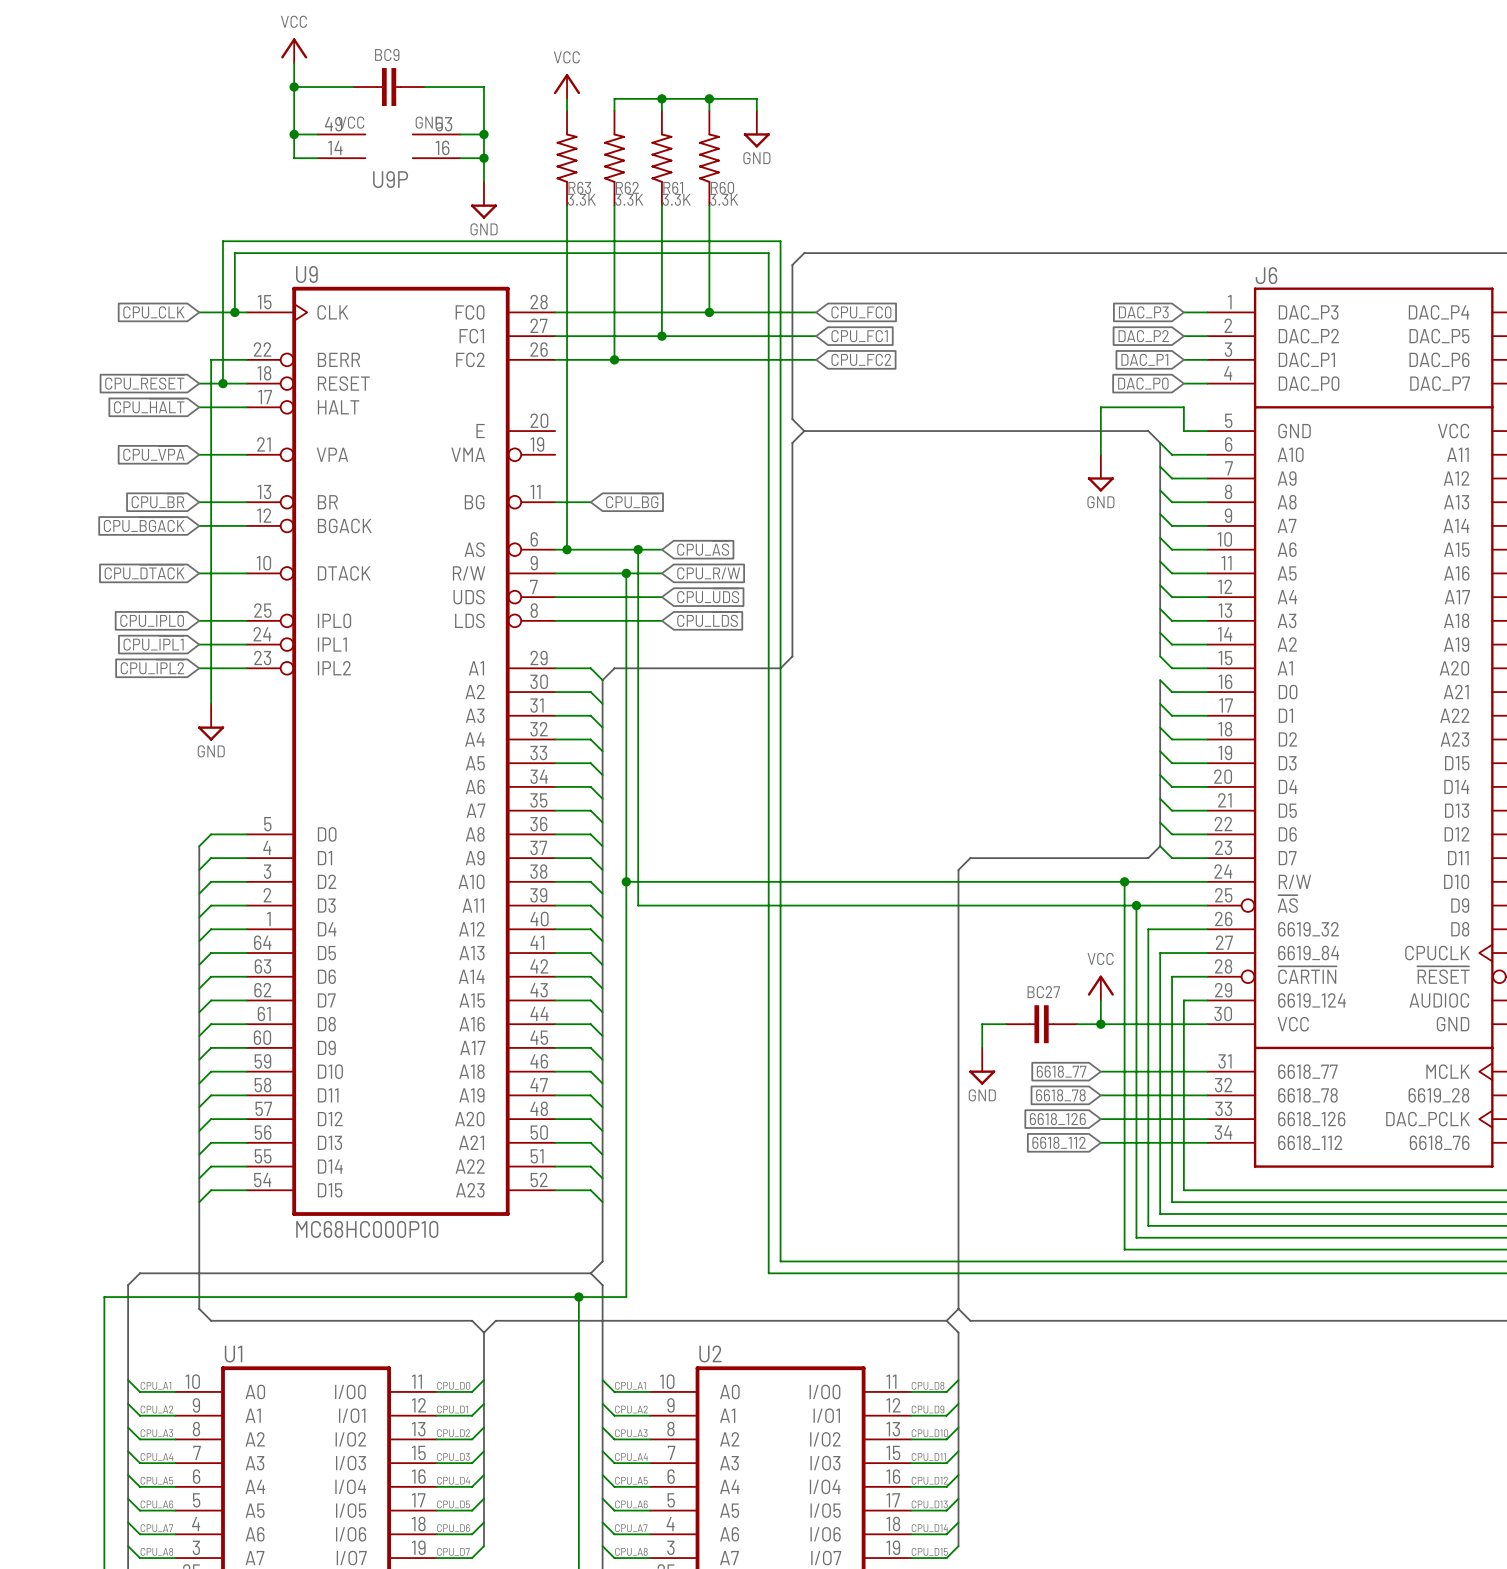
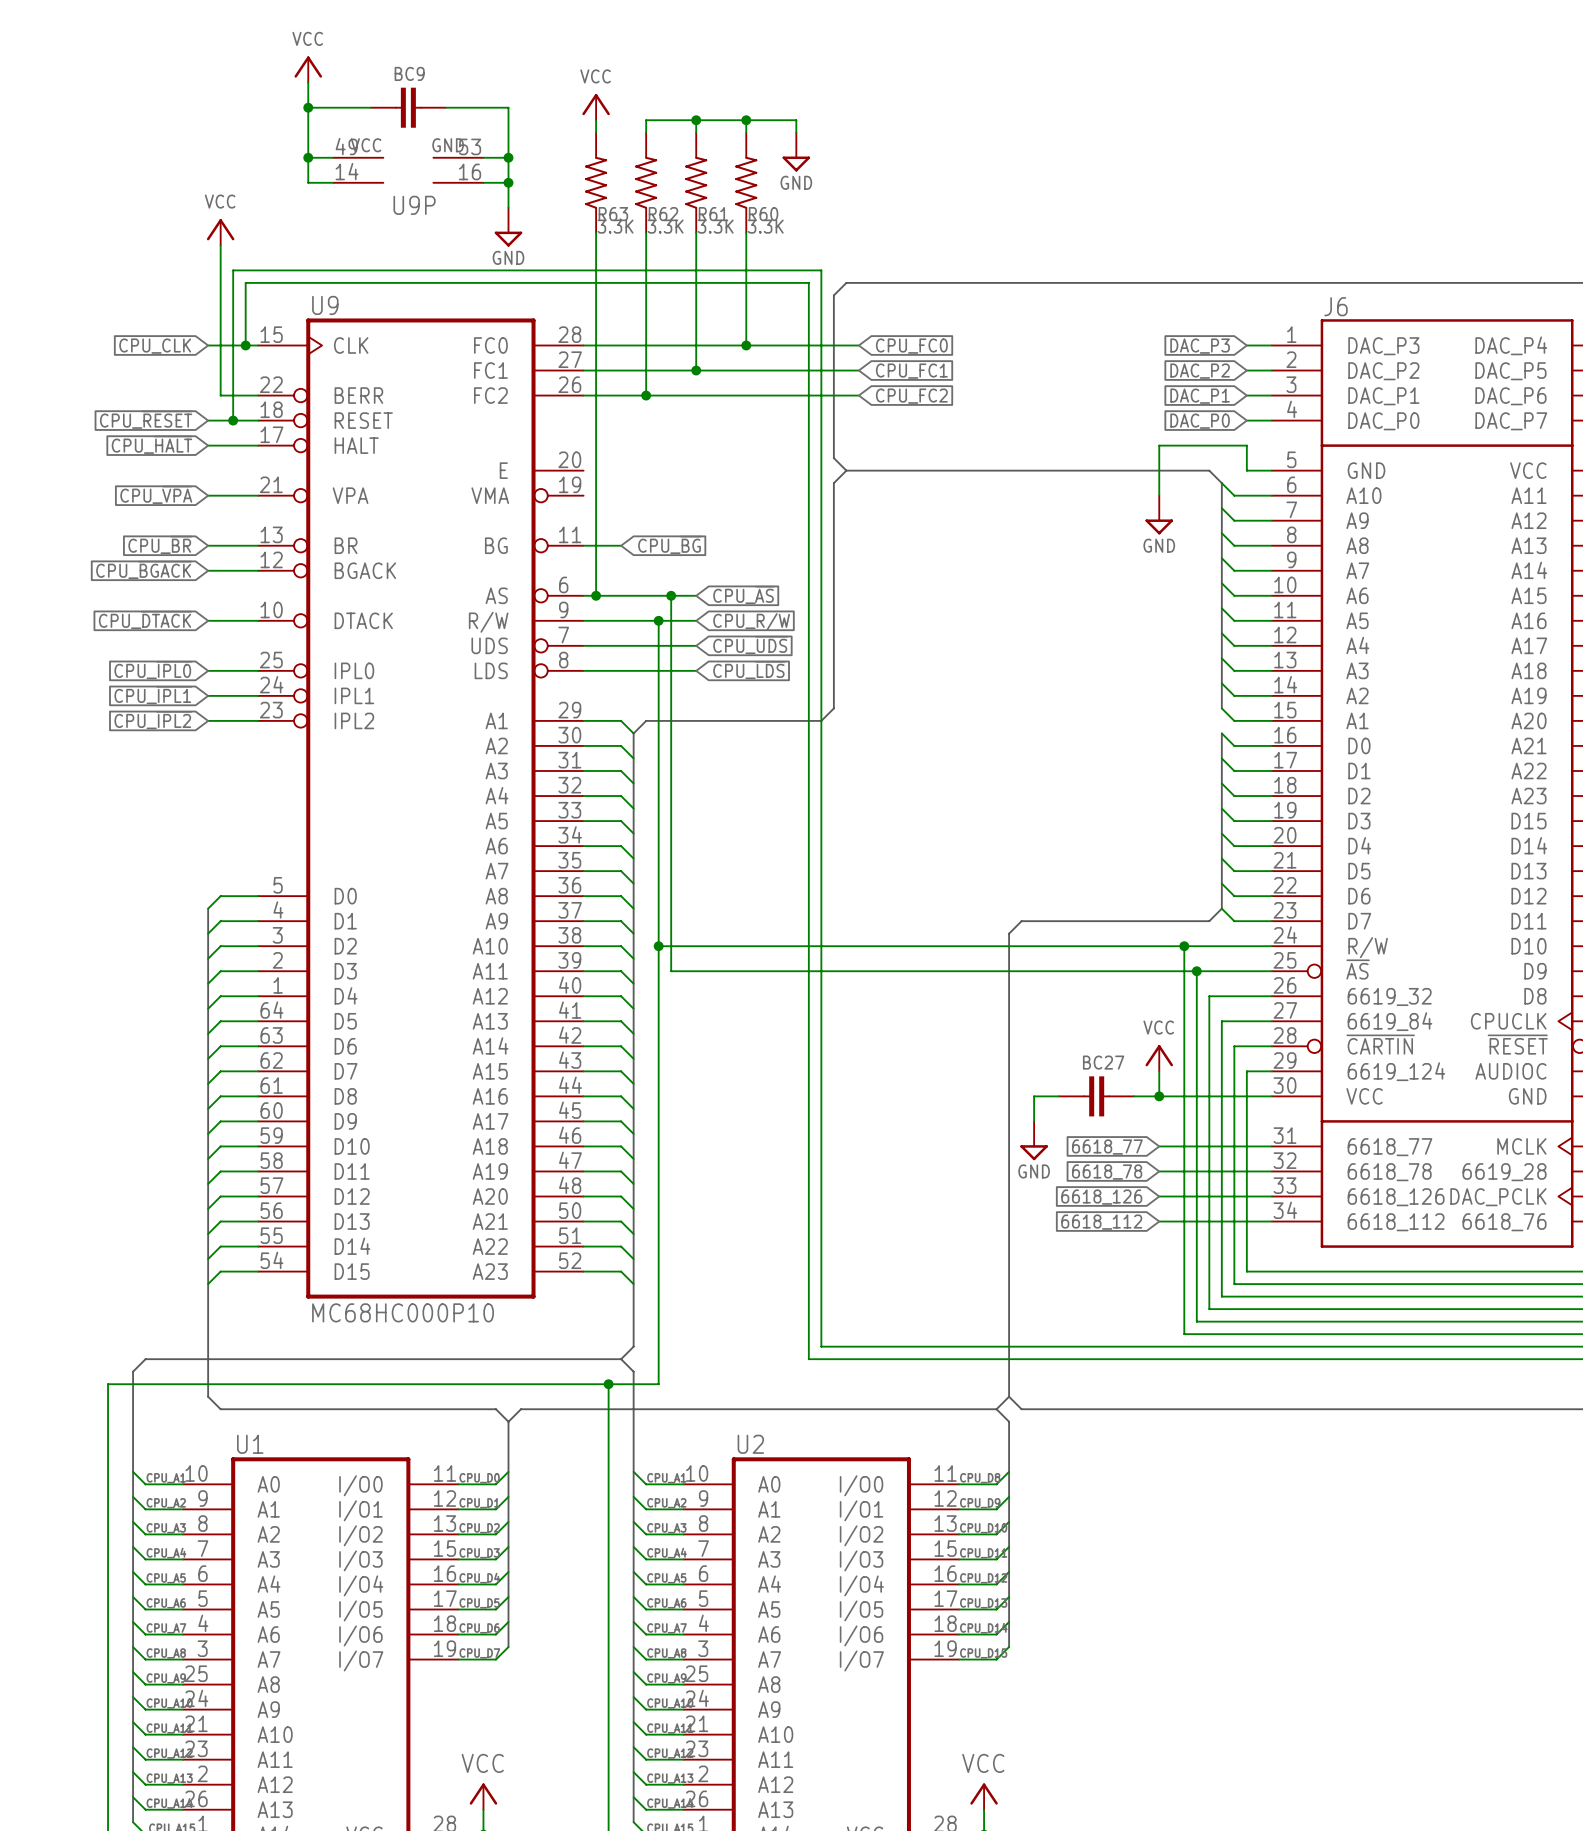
power symbol: none -> VCC (220, 232)
wire: (211, 359) (211, 703) -> (220, 395) (220, 245)
power symbol: GND (211, 722) -> none

